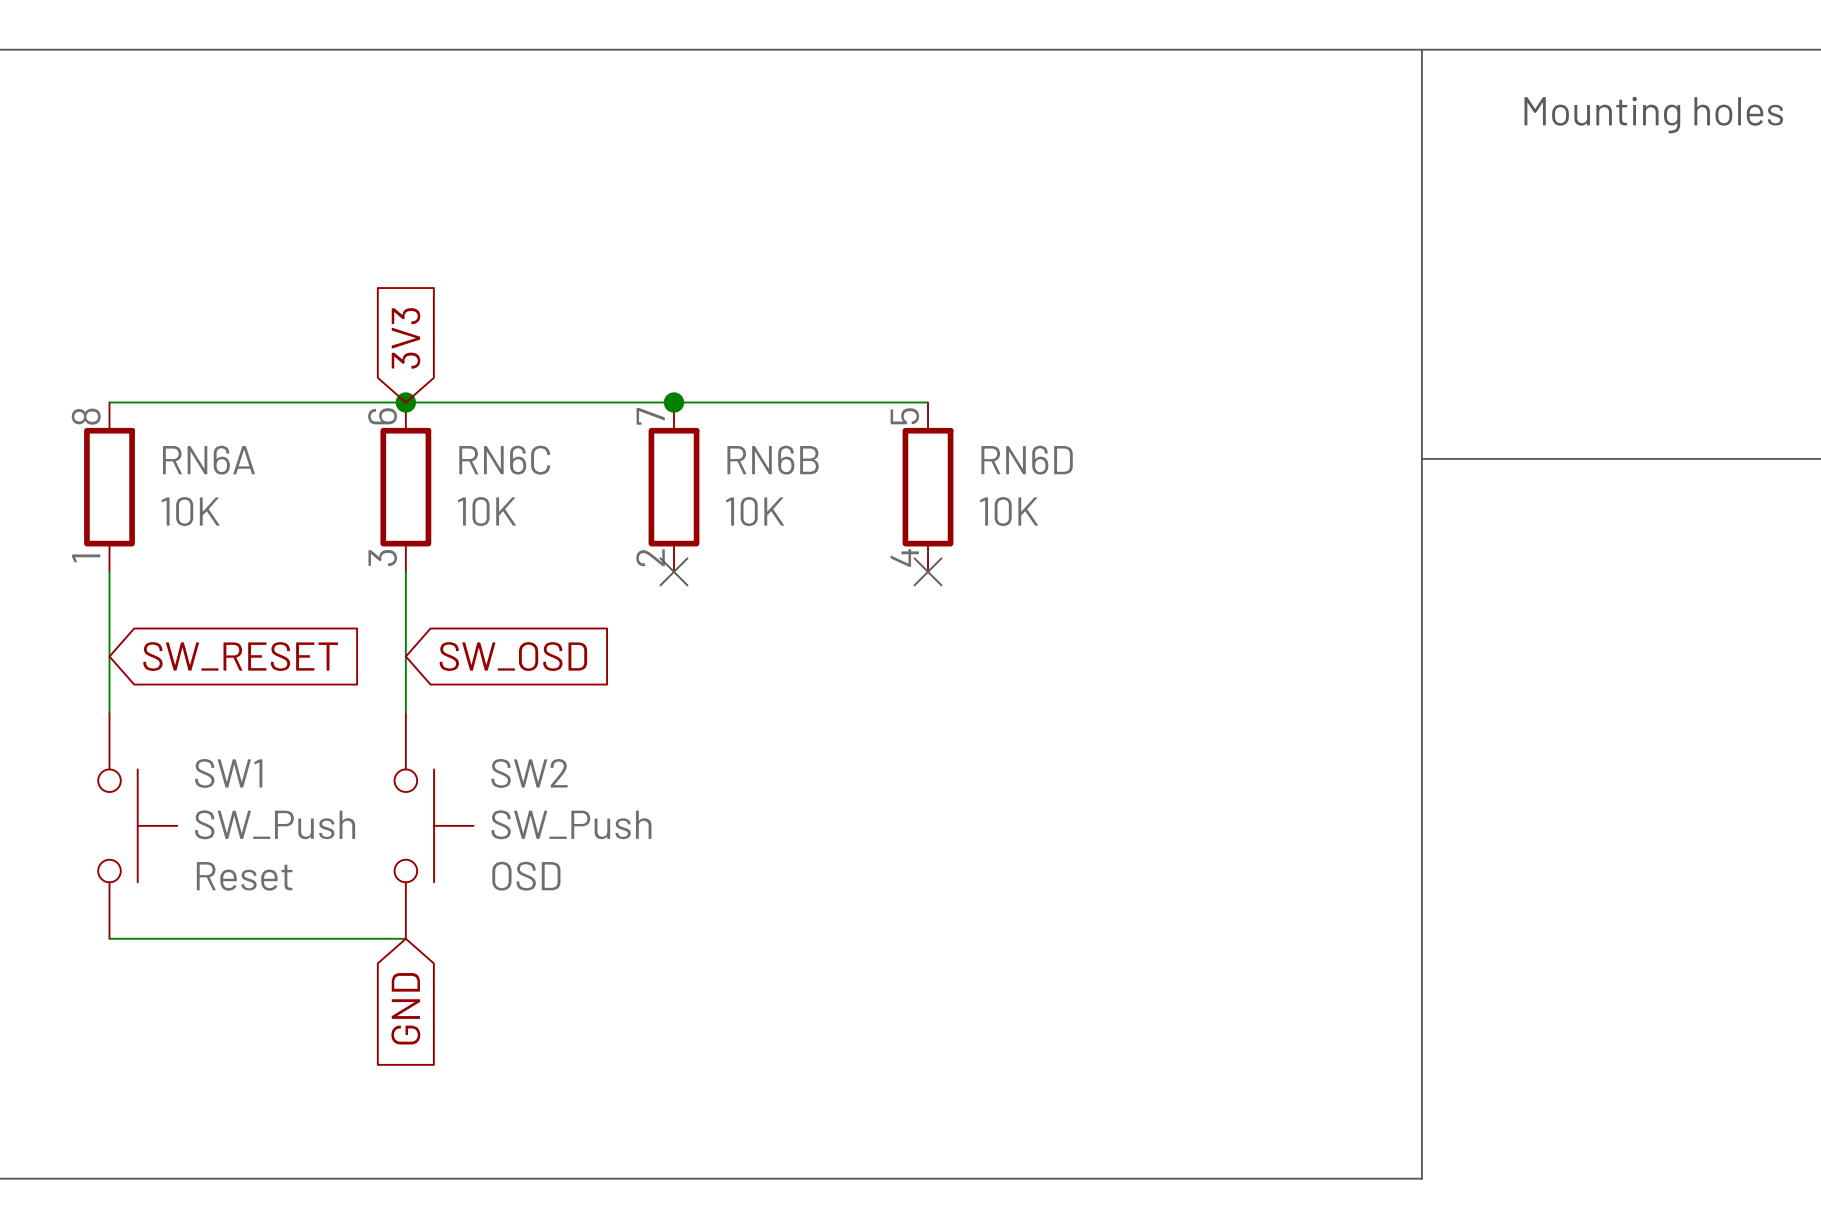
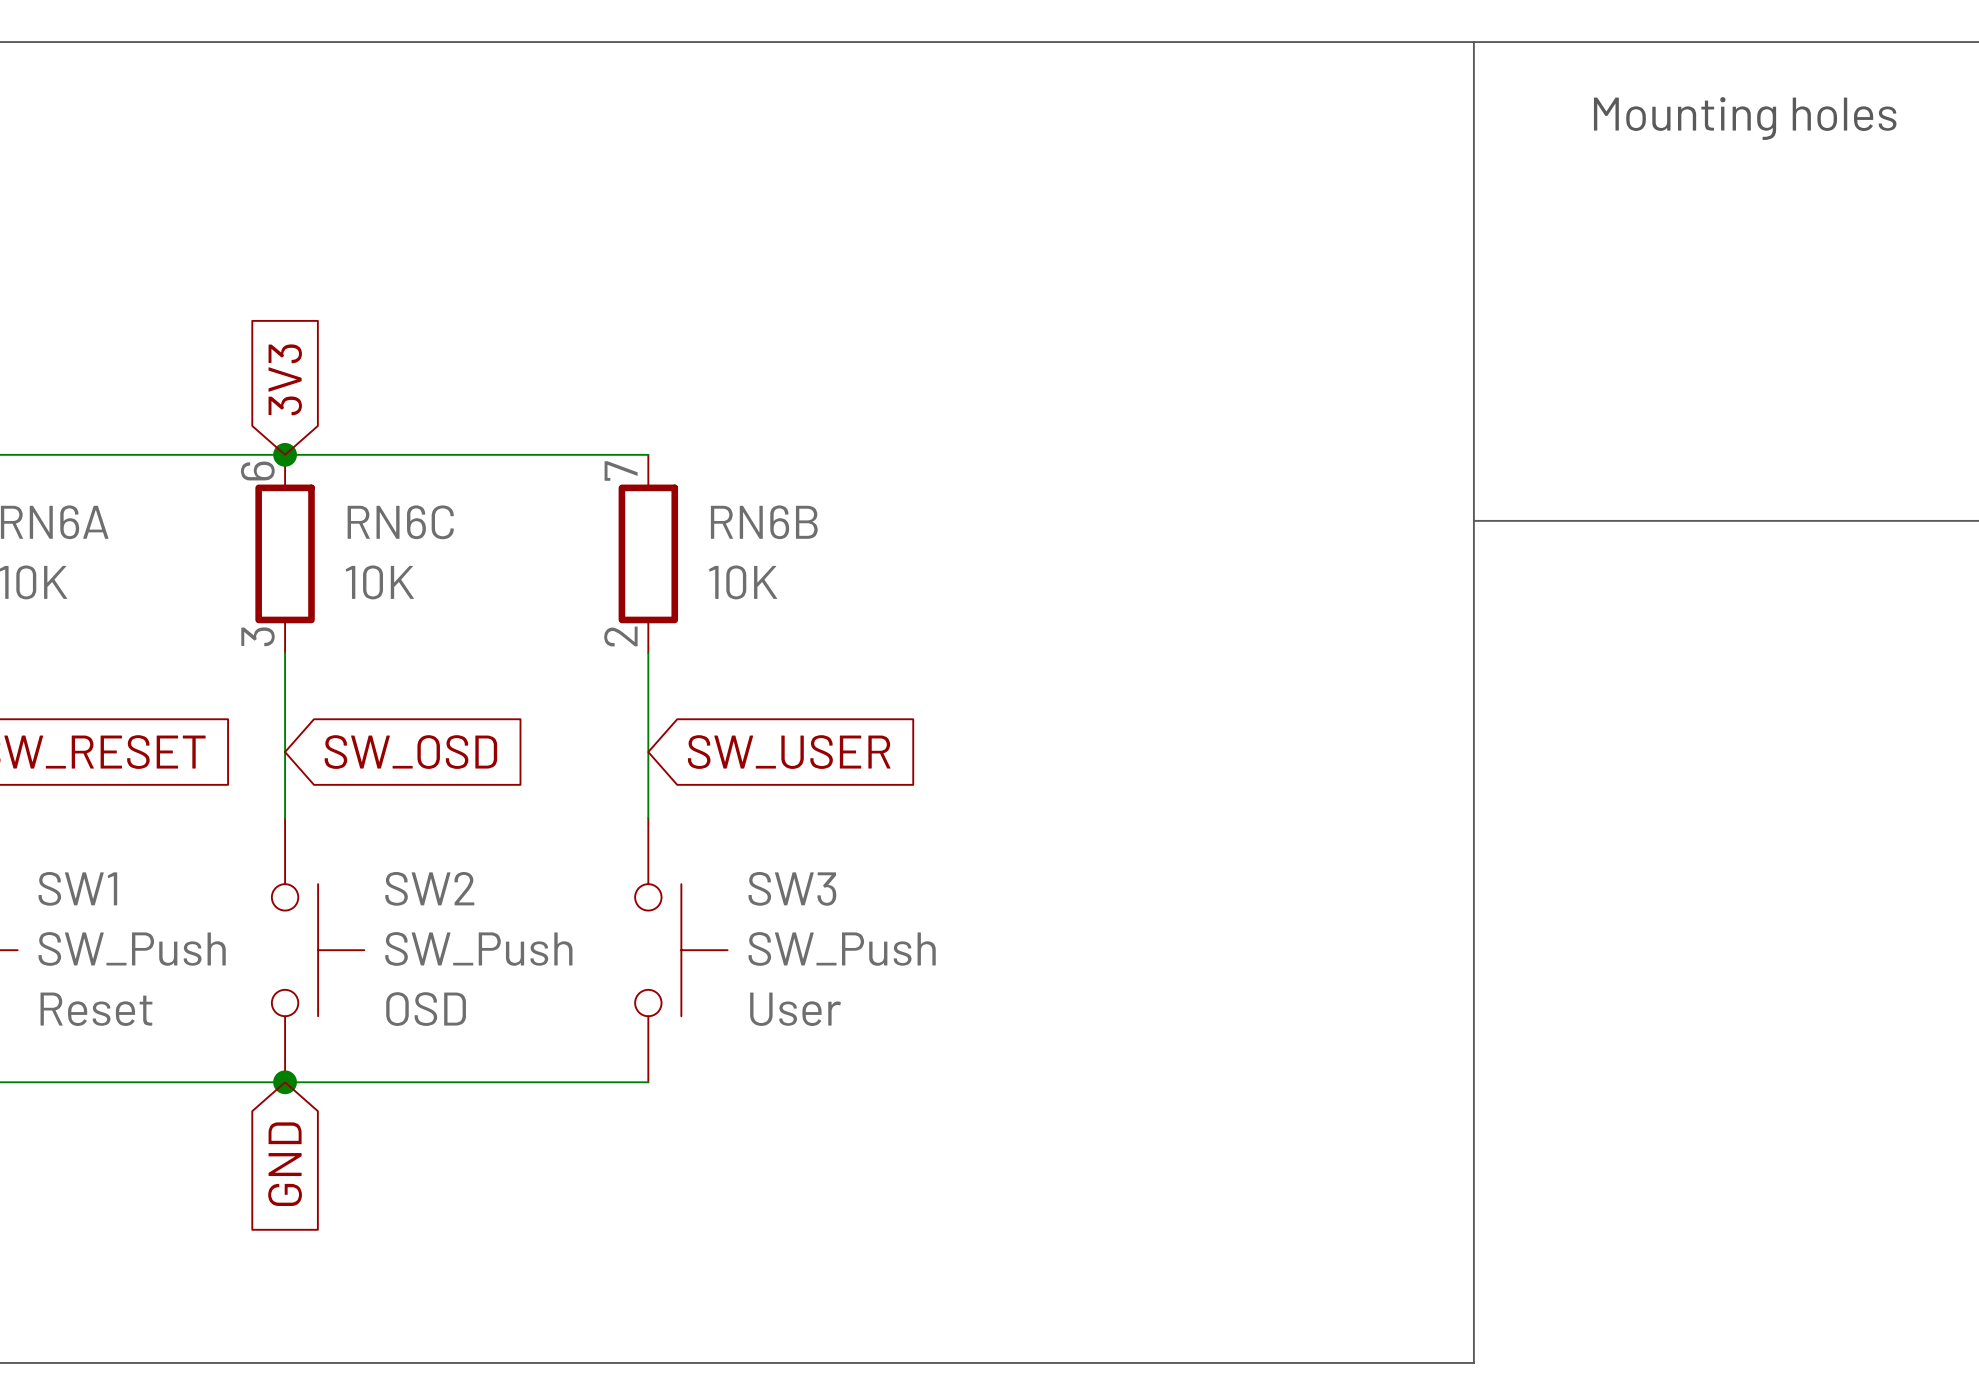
junction: (673, 402) -> none
wire: (716, 402) (928, 402) -> none
RN6B position: (673, 487) -> (648, 553)
RN6D: 10K (928, 487) -> none
no-connect mark: (673, 571) -> none
wire: none -> (648, 652) (648, 818)
no-connect mark: (928, 571) -> none
global label: none -> SW_USER (789, 752)
SW3: none -> SW_Push (681, 950)
wire: none -> (285, 1082) (648, 1082)
junction: none -> (285, 1082)

